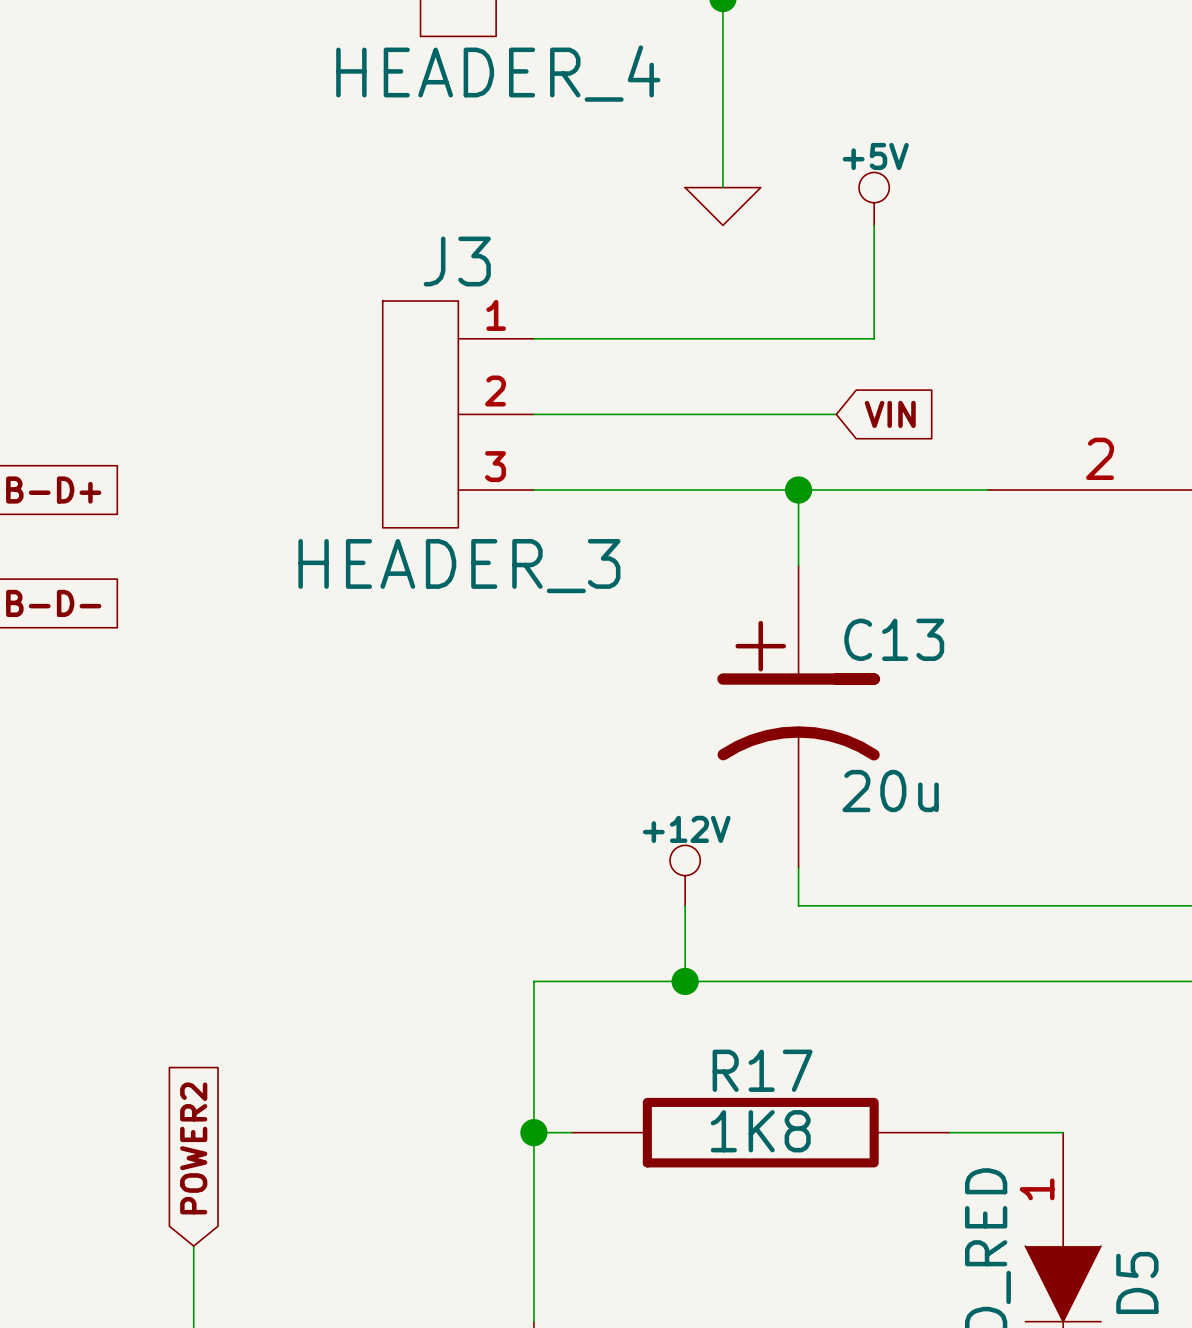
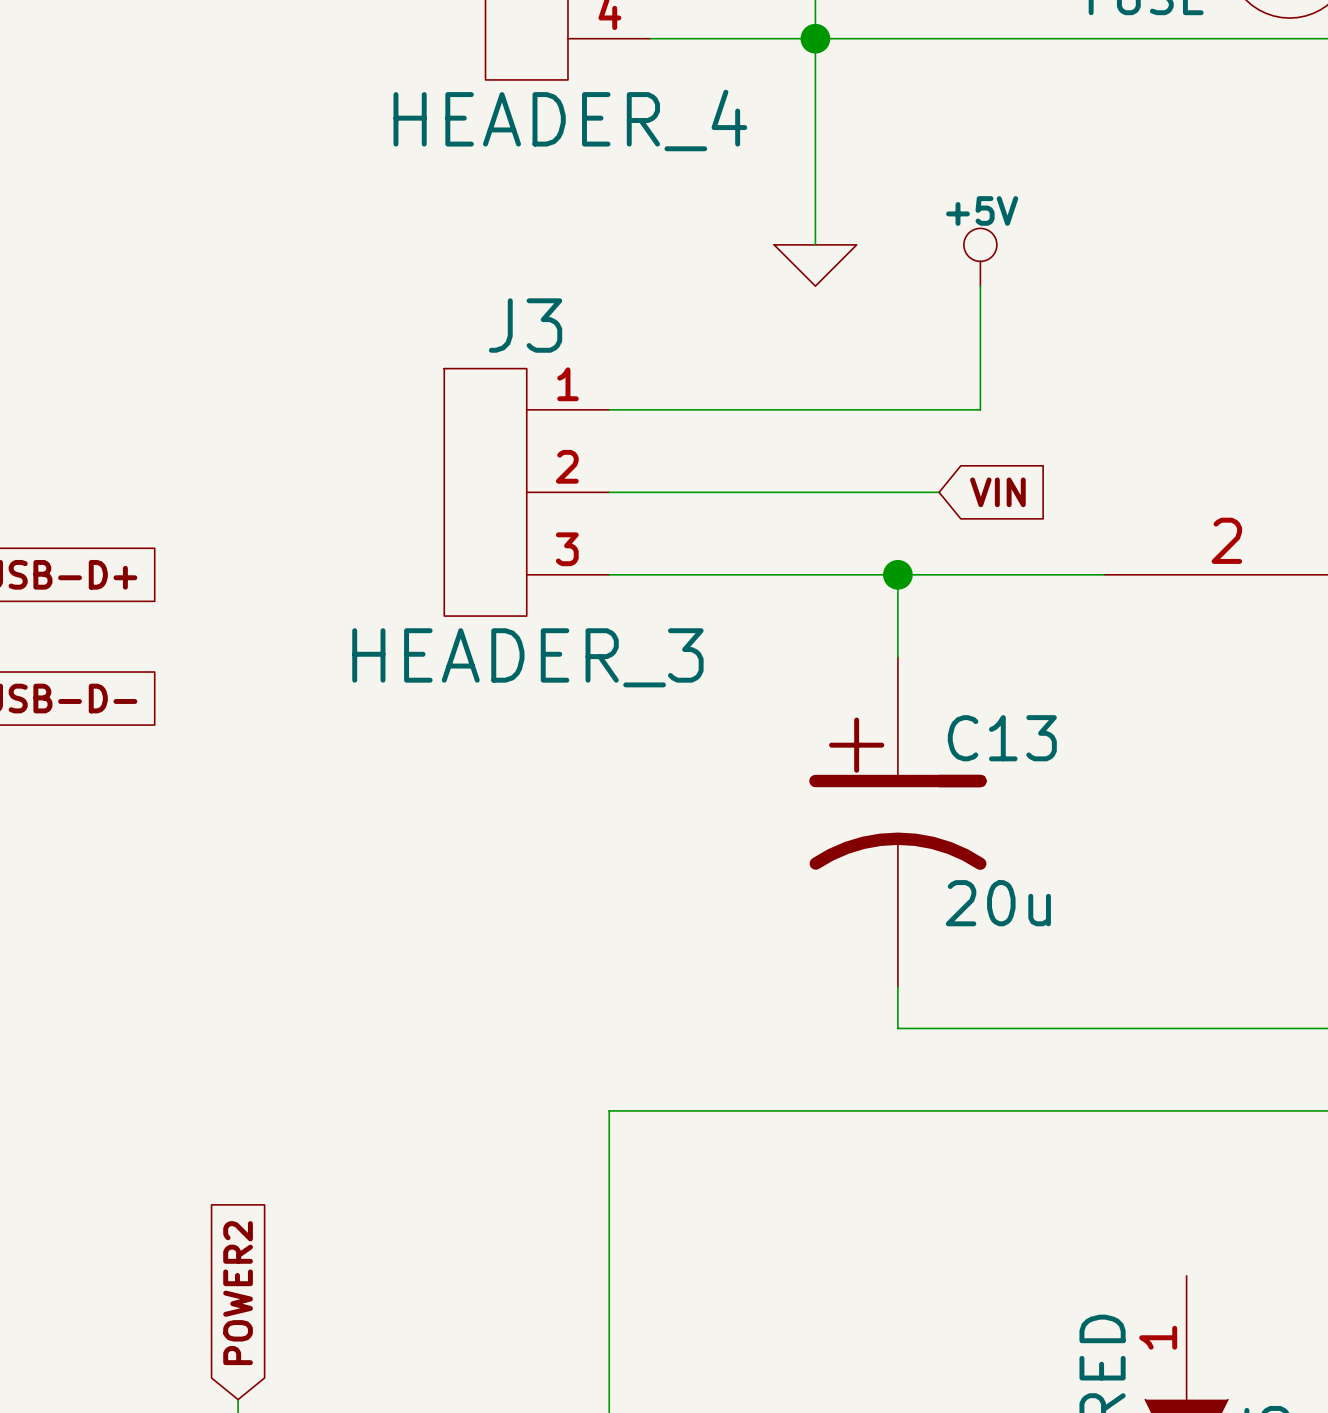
power symbol: +12V (685, 875) -> none
wire: (685, 905) (685, 981) -> none
junction: (685, 981) -> none
wire: (533, 1132) (571, 1132) -> none
junction: (533, 1132) -> none
R17: 1K8 (760, 1132) -> none
wire: (949, 1132) (1063, 1132) -> none

